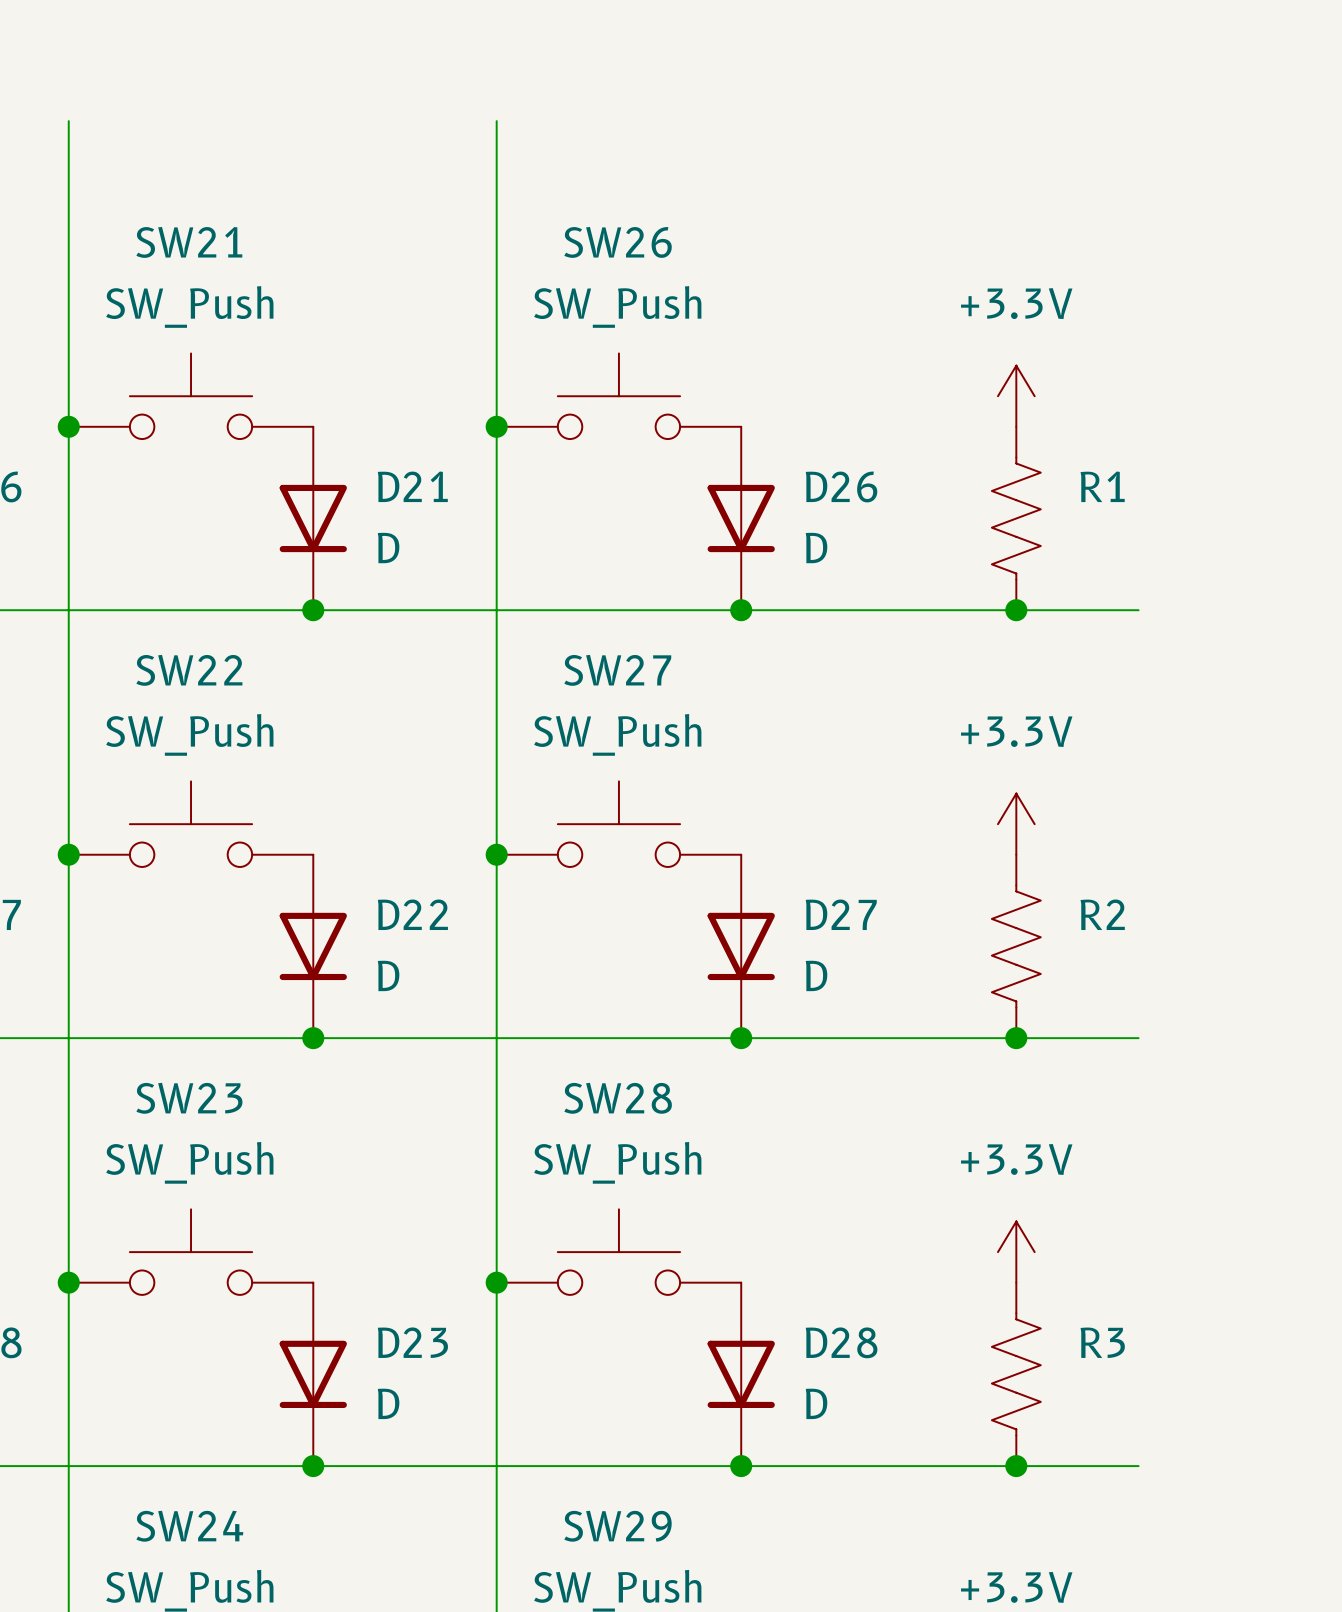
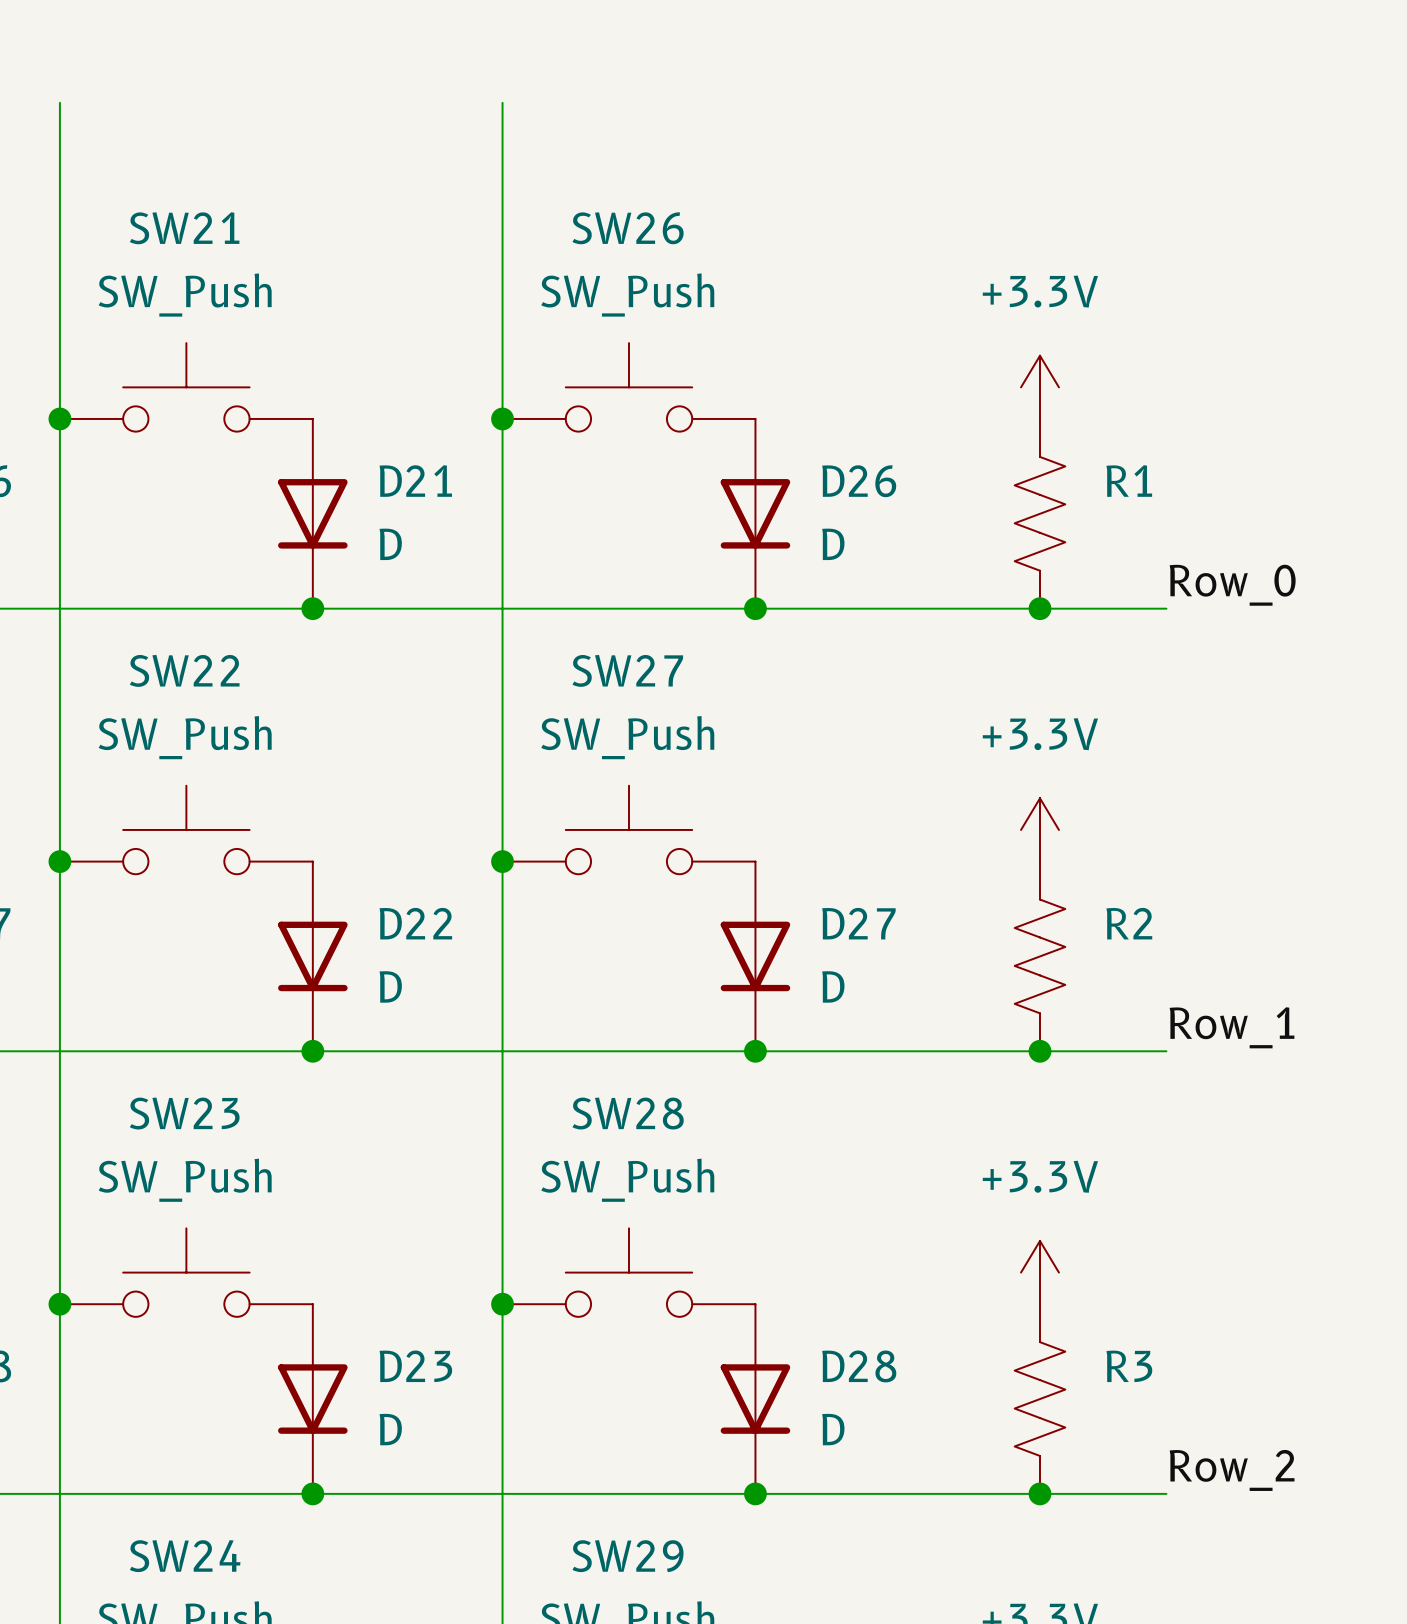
label: none -> Row_0 (1232, 585)
label: none -> Row_1 (1232, 1027)
label: none -> Row_2 (1232, 1470)

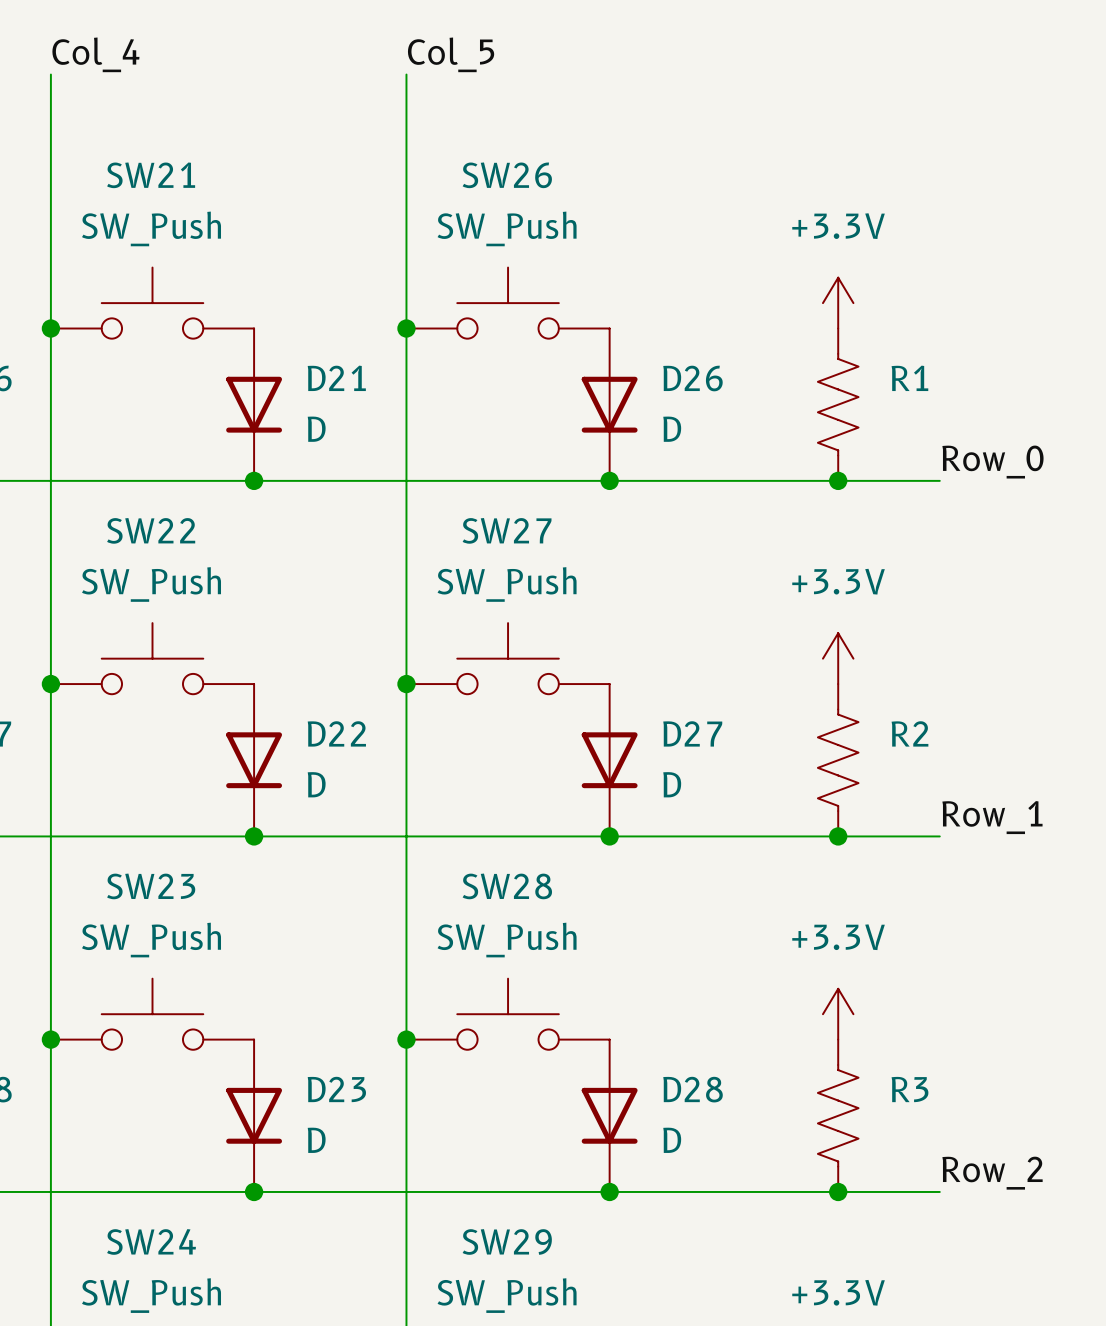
label: none -> Col_4 (95, 54)
label: none -> Col_5 (451, 54)

